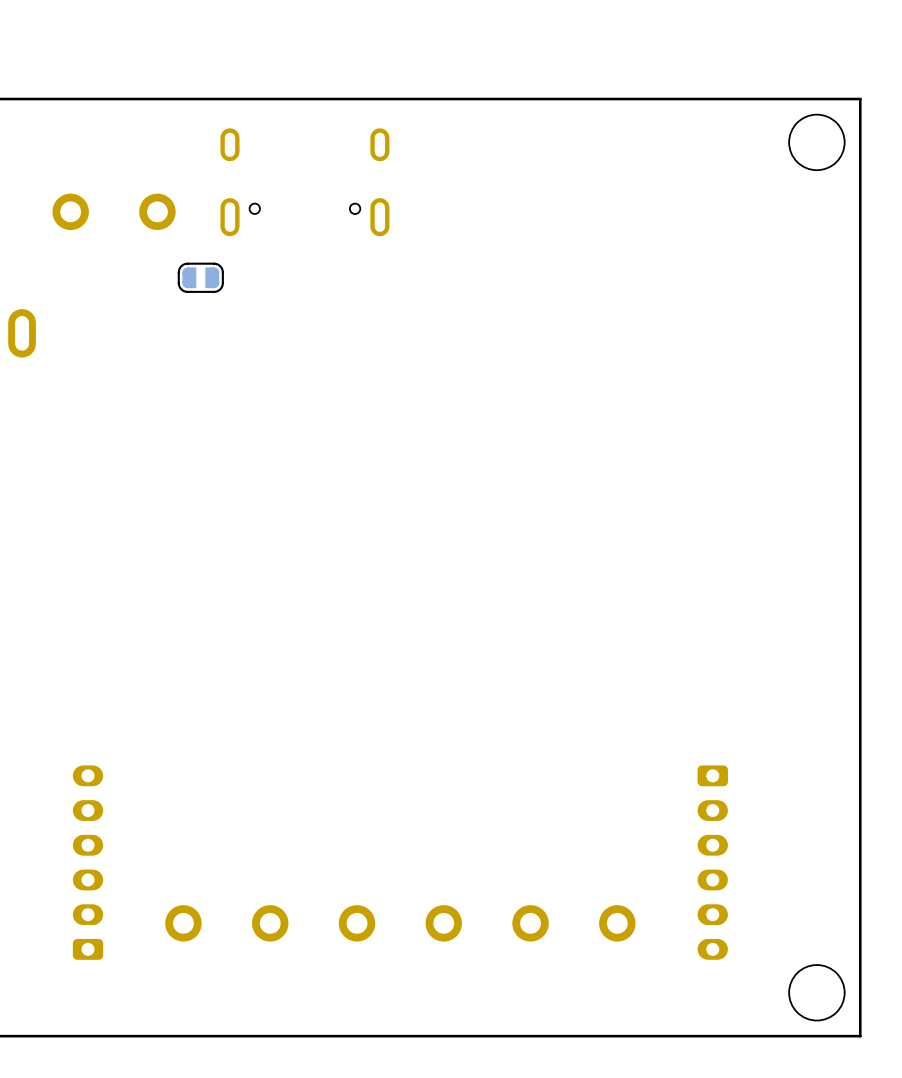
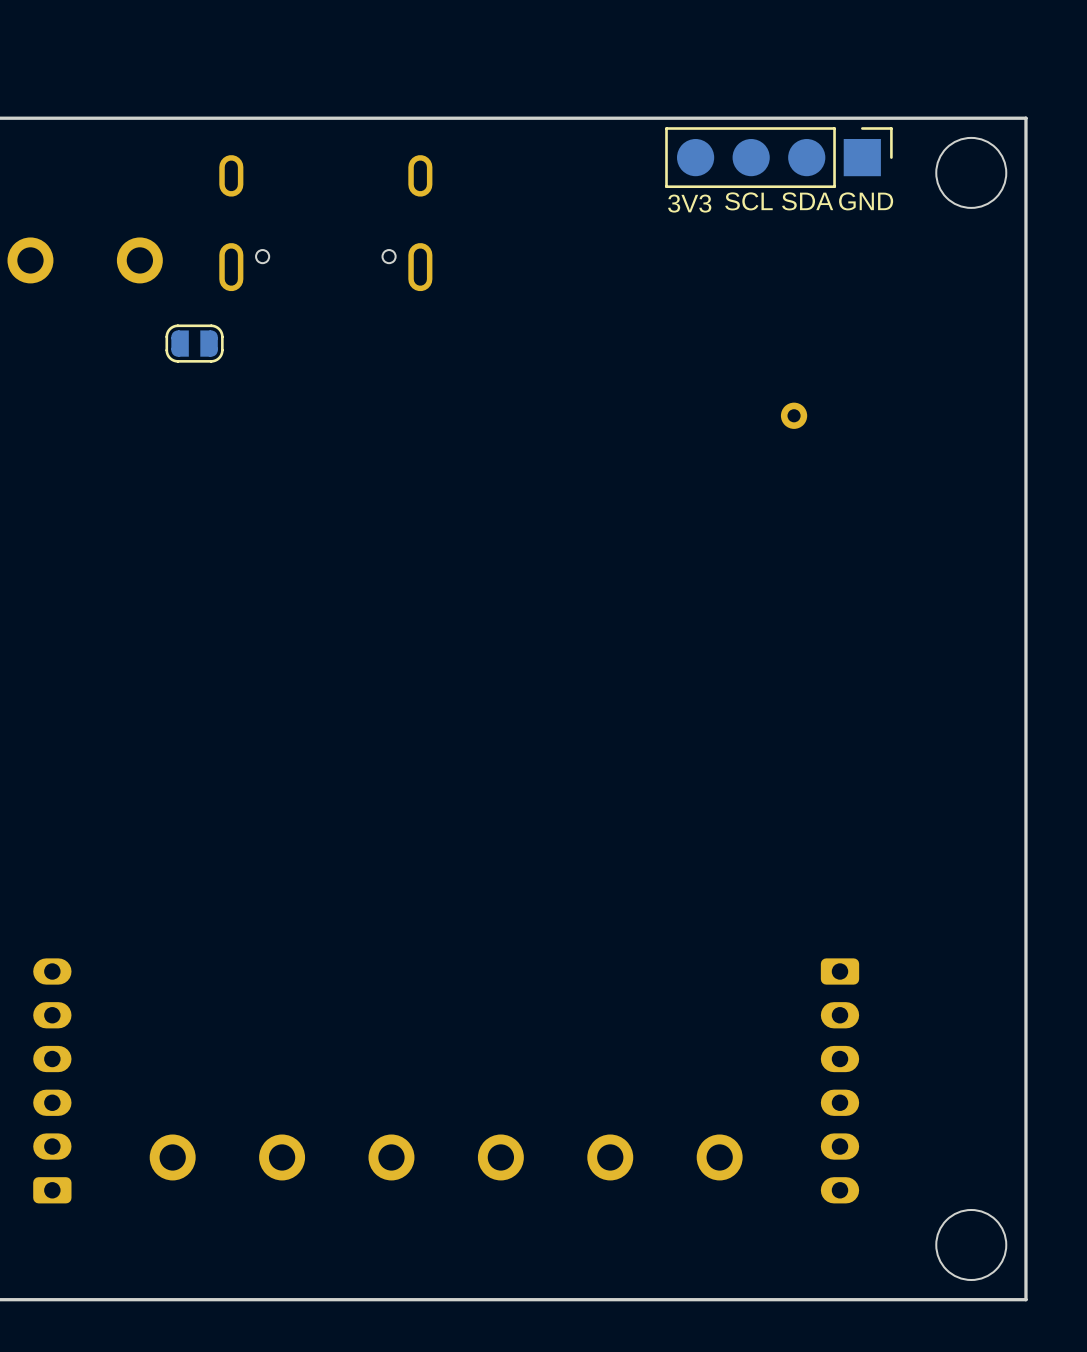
part: none -> (778, 157)
text: none -> SCL (748, 201)
text: none -> SDA (807, 201)
text: none -> GND (866, 201)
text: none -> 3V3 (689, 203)
part: none -> (794, 415)

